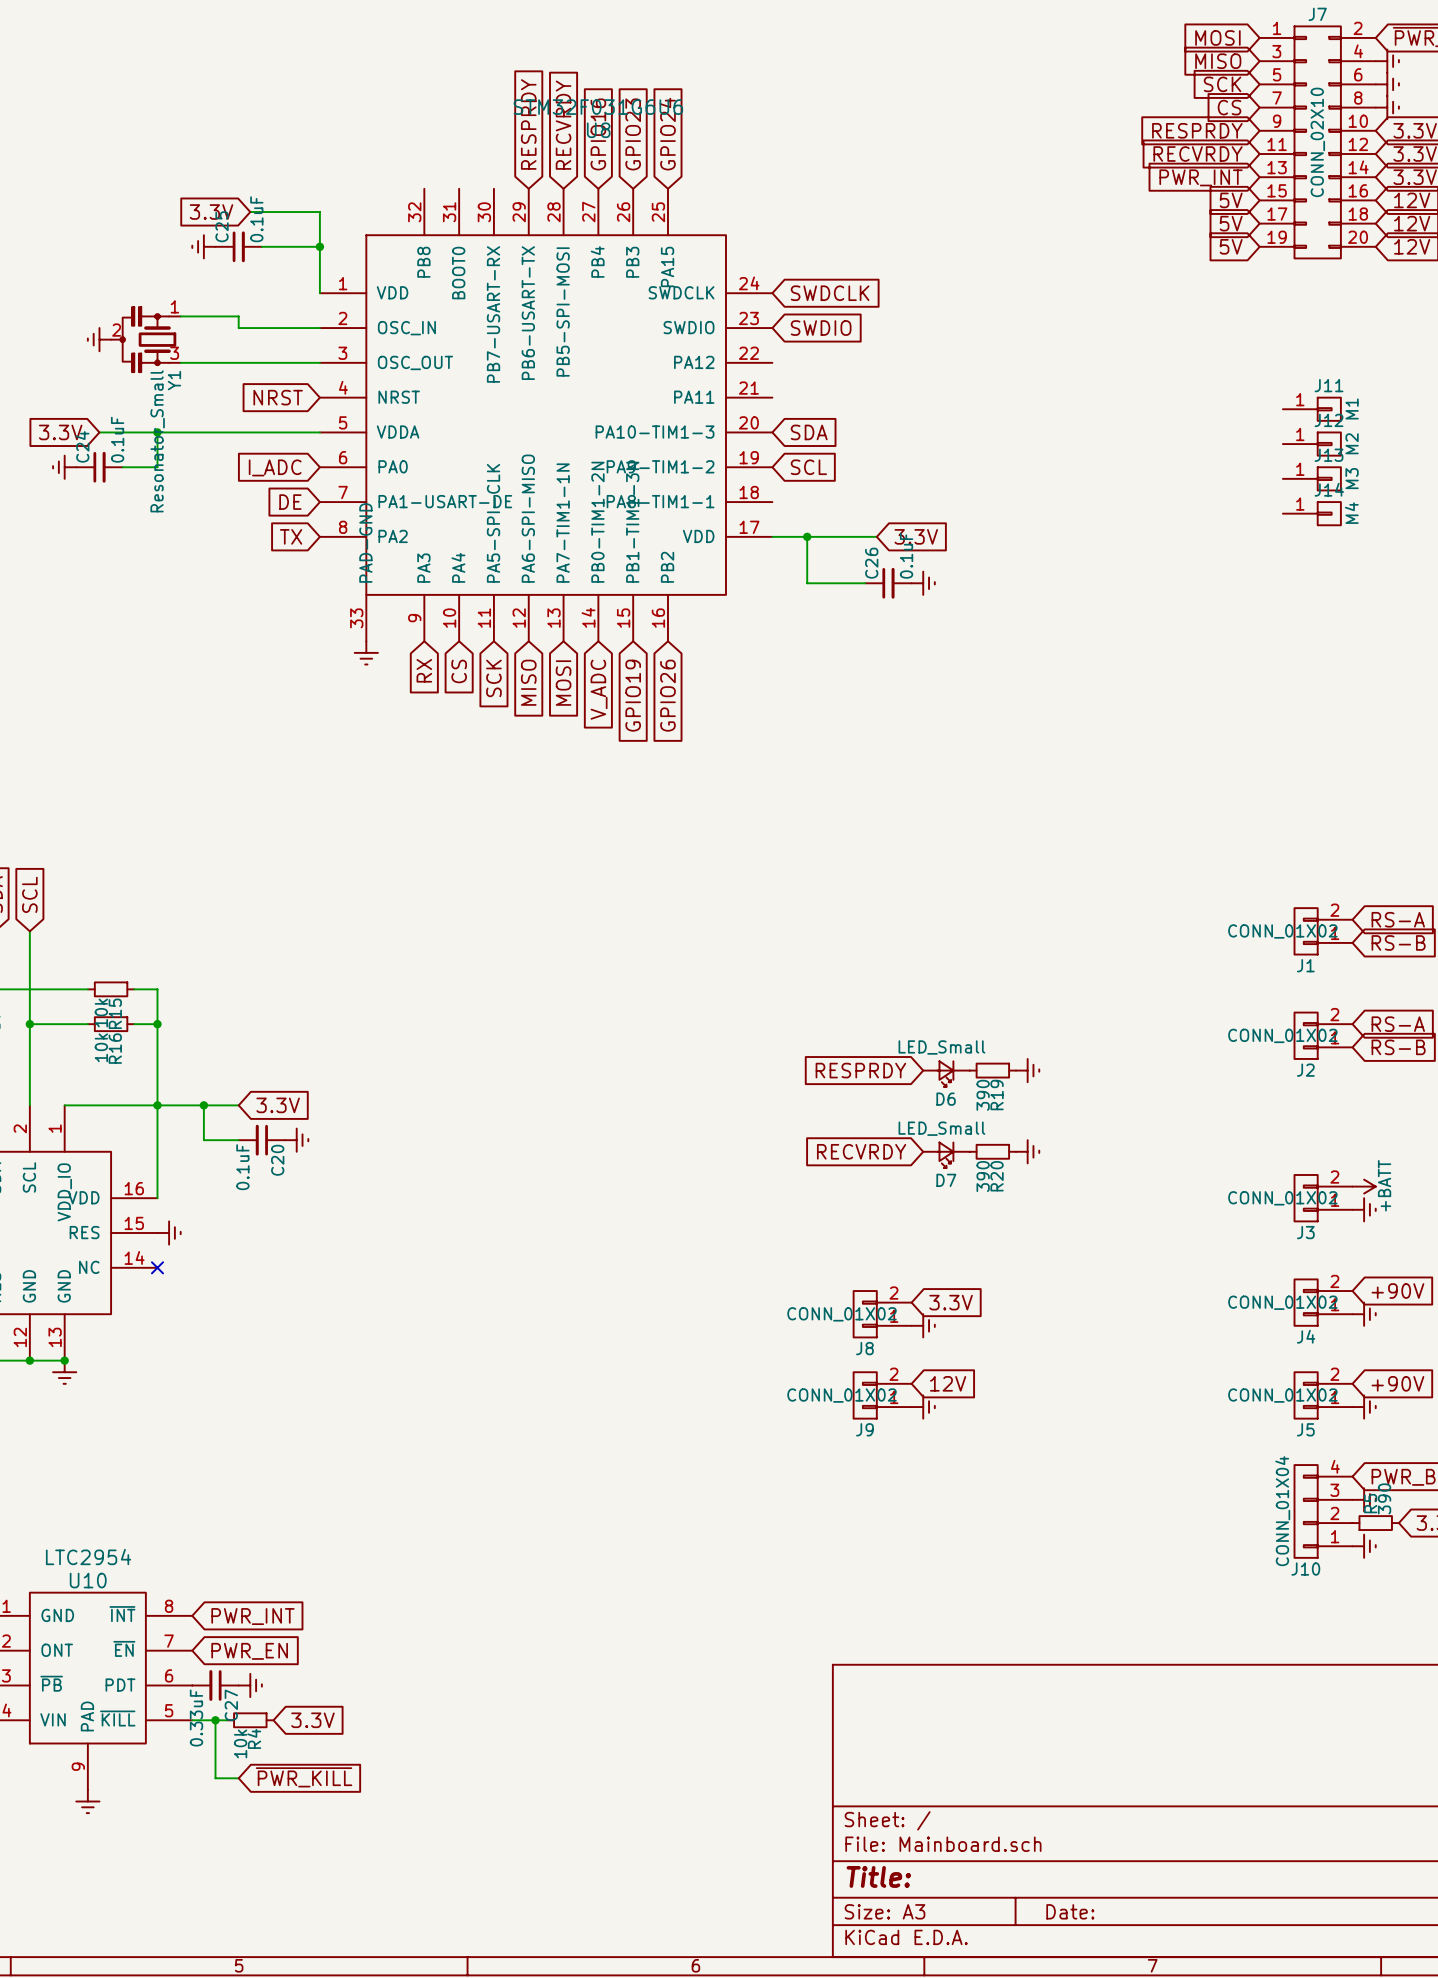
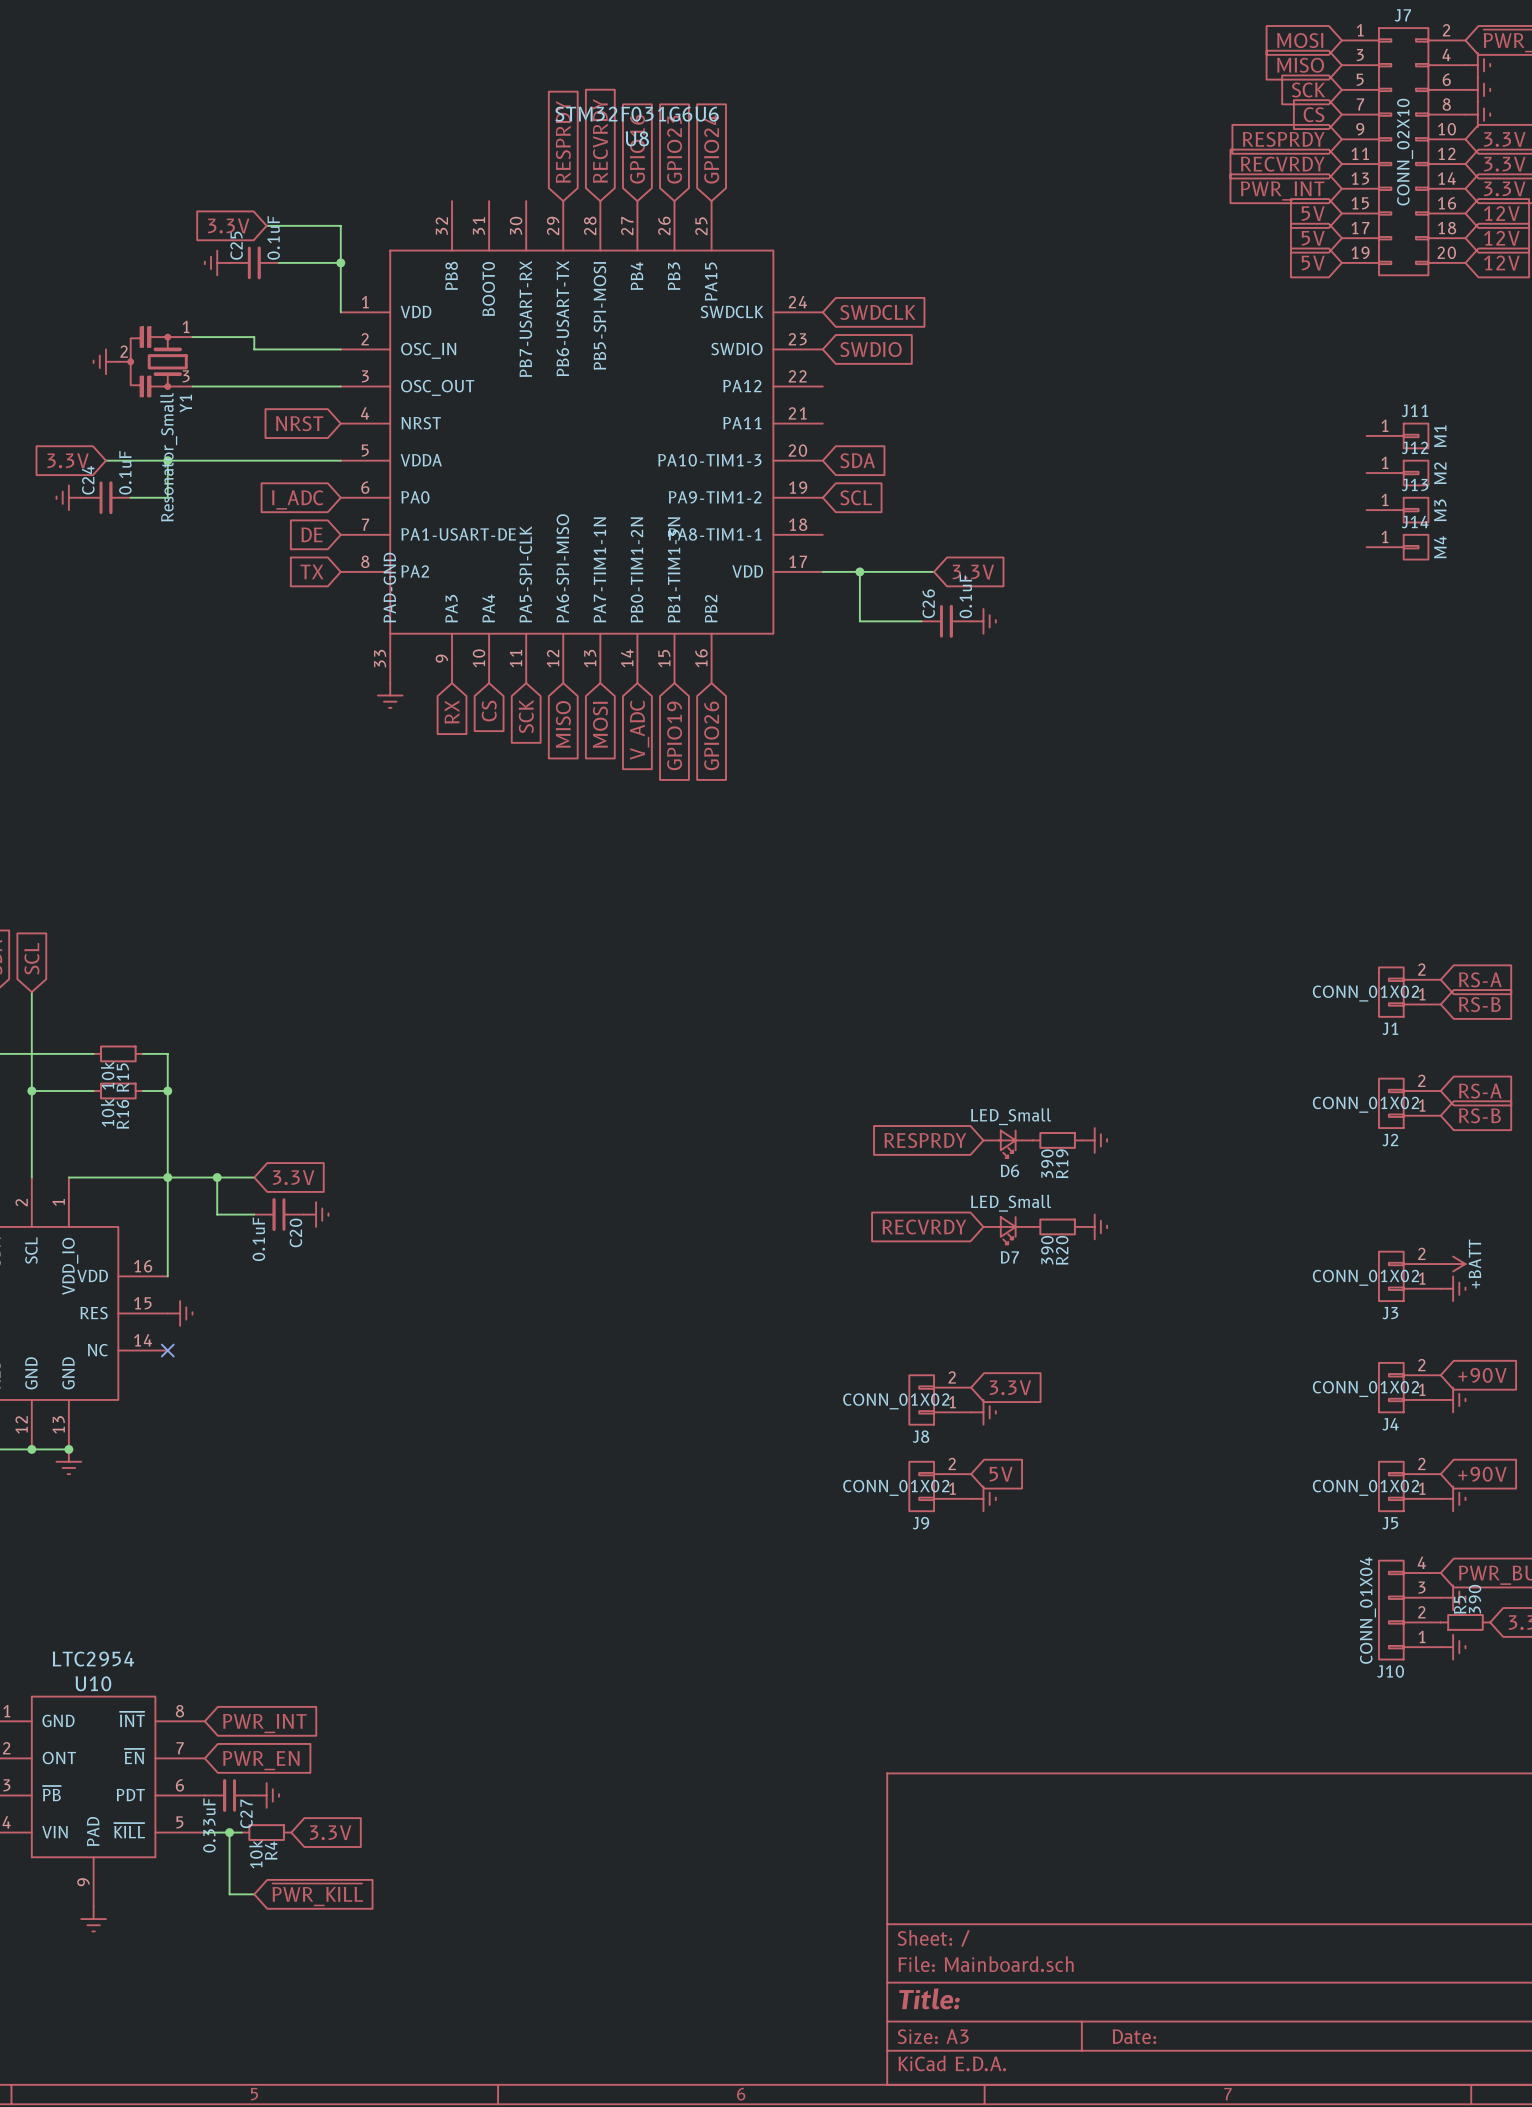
global label: 12V (948, 1383) -> 5V (1001, 1474)

